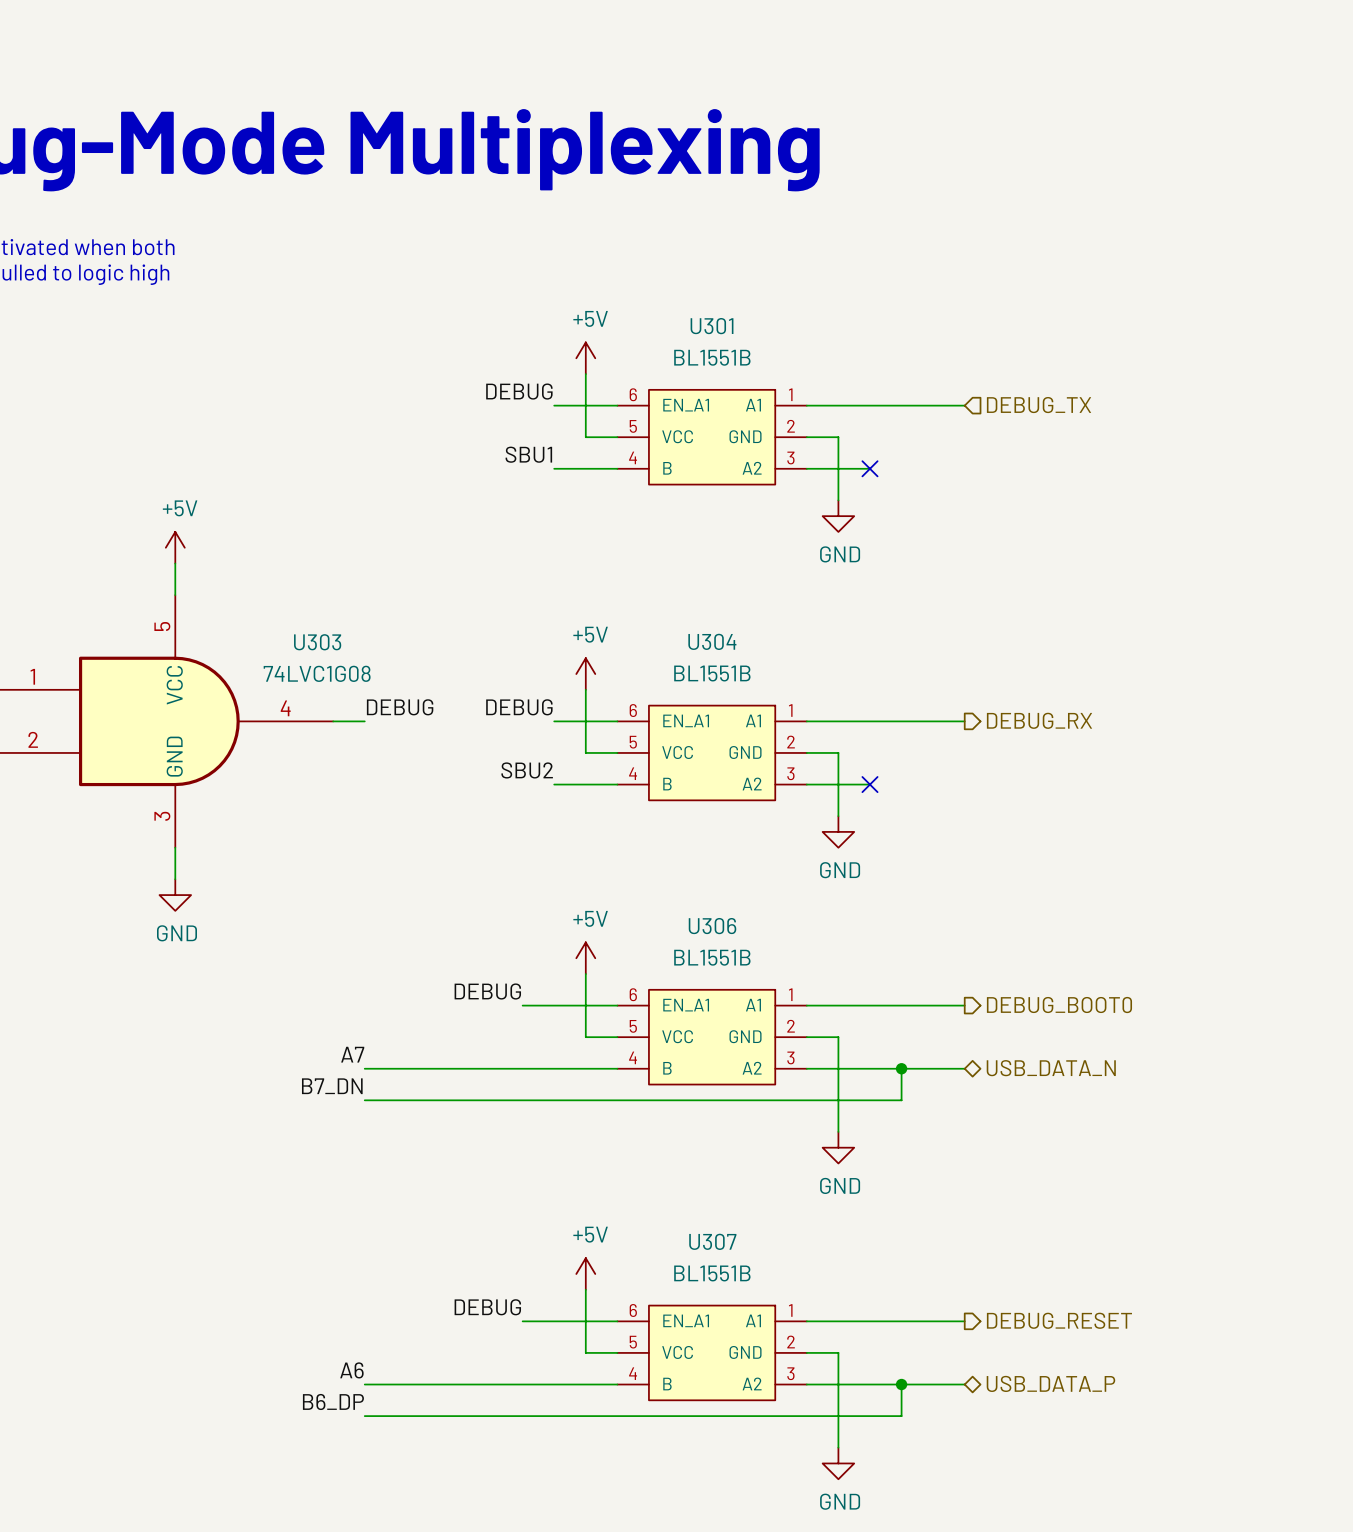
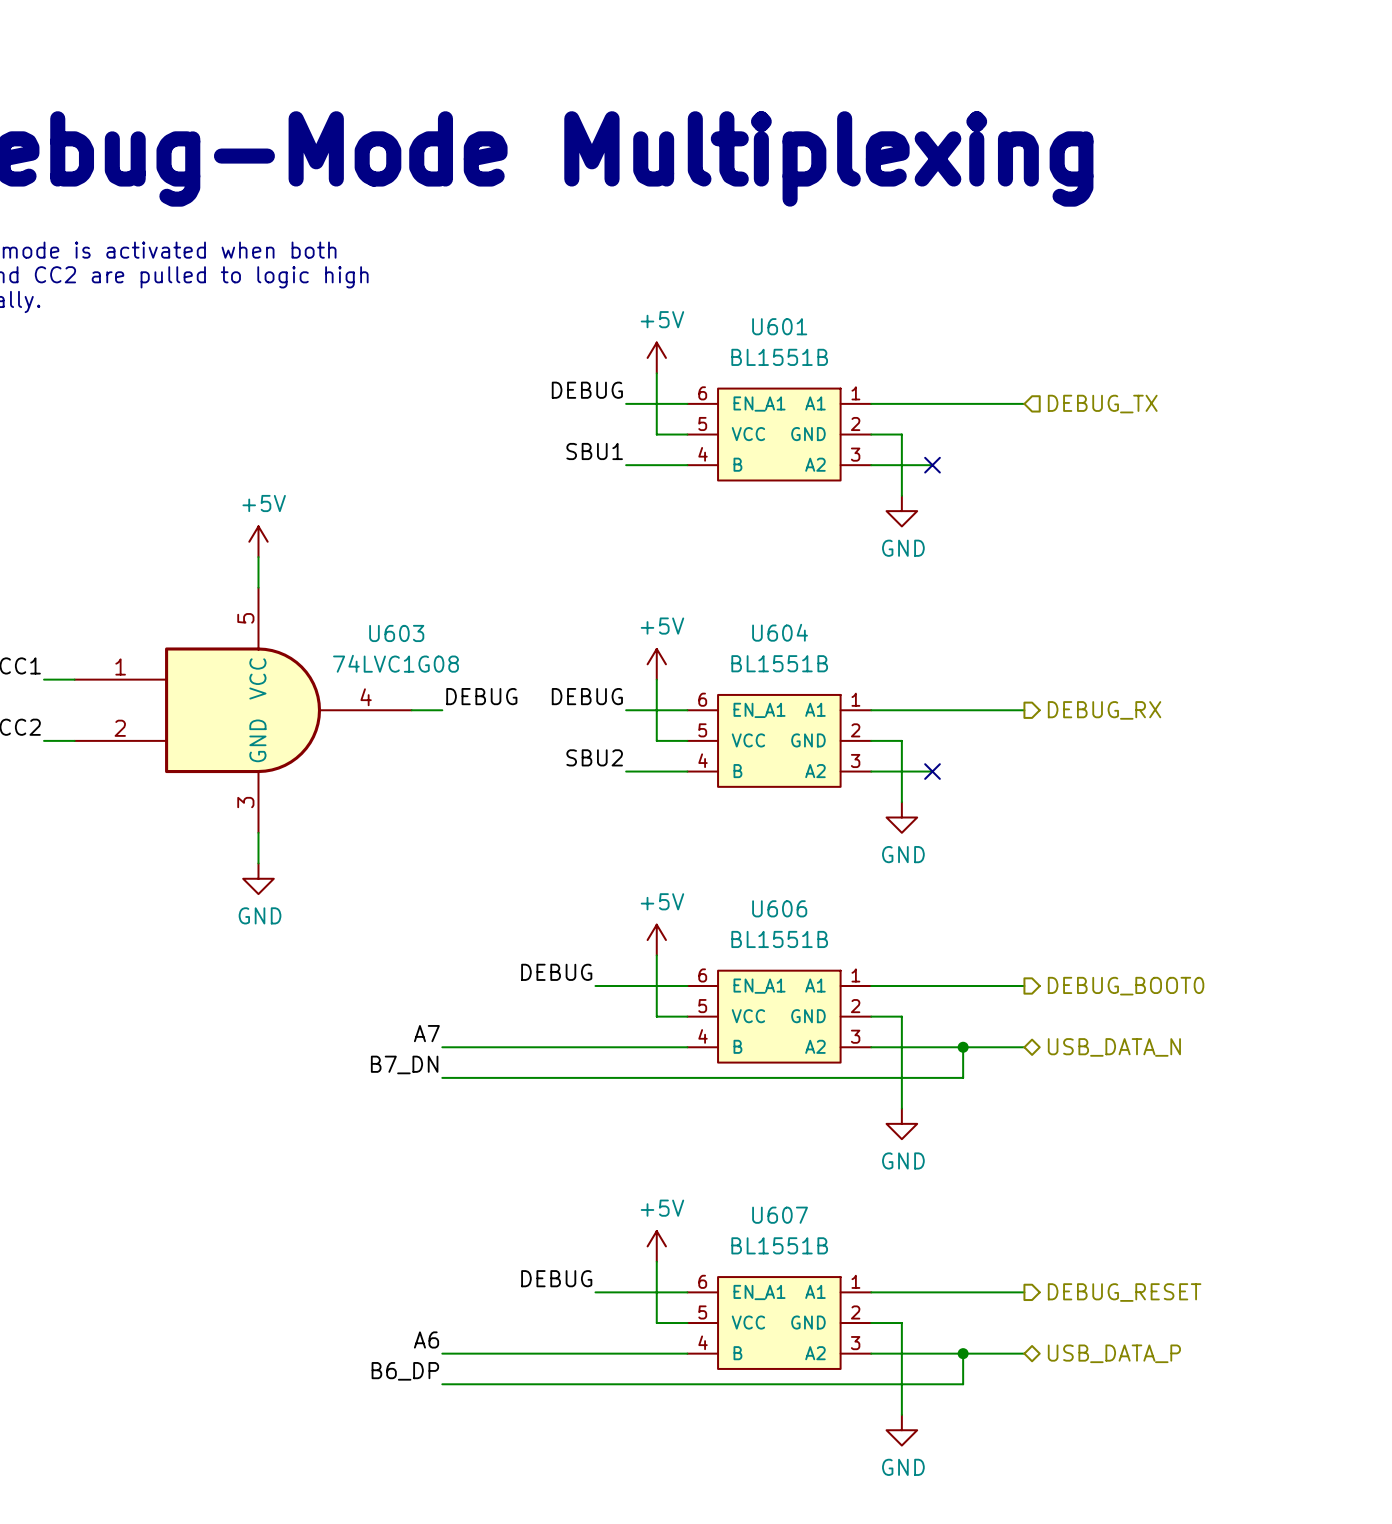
U301 name: U301 (712, 326) -> U601 (779, 326)
U304 name: U304 (712, 641) -> U604 (780, 632)
U303 name: U303 (317, 642) -> U603 (396, 633)
U306 name: U306 (712, 926) -> U606 (779, 908)
U307 name: U307 (712, 1241) -> U607 (780, 1215)

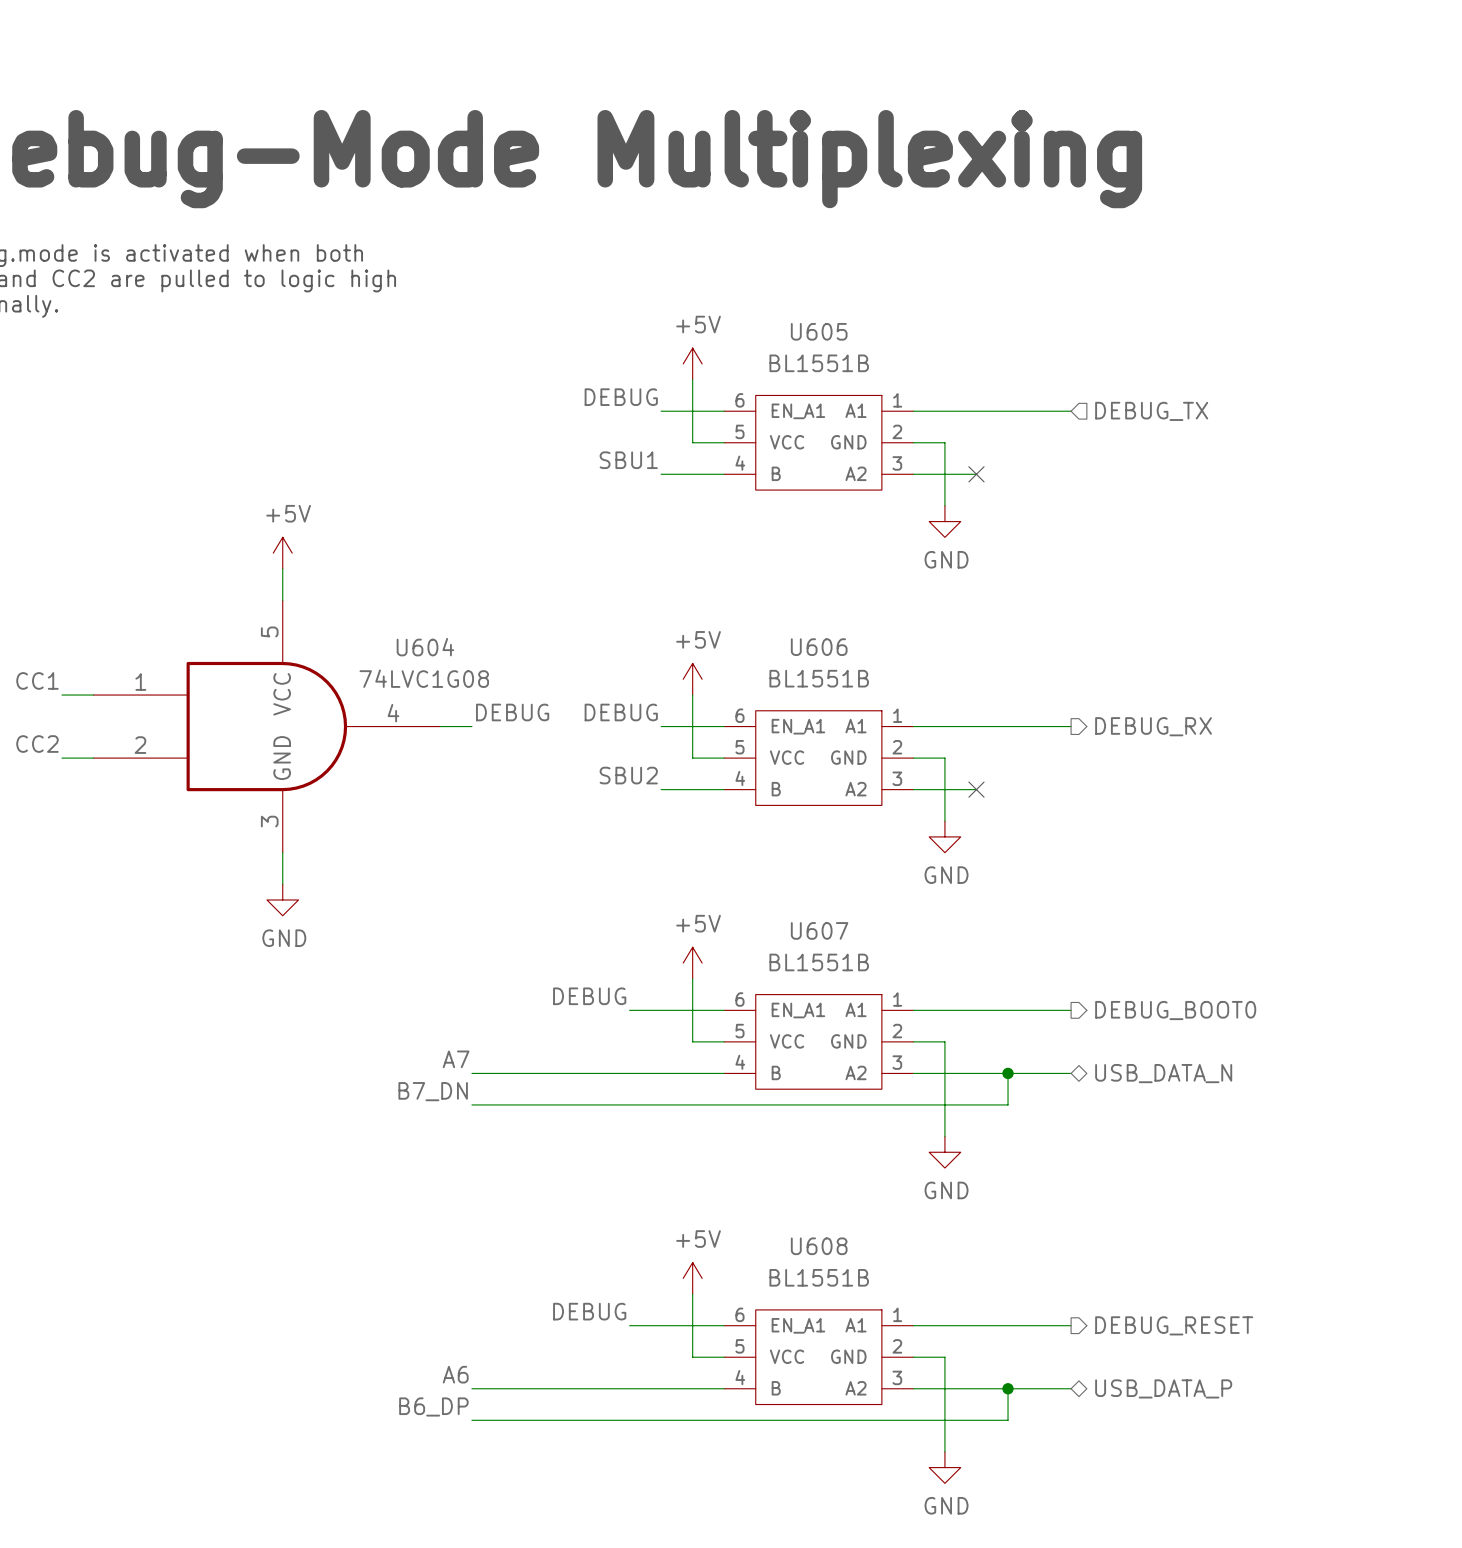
U601 name: U601 (779, 326) -> U605 (819, 331)
U604 name: U604 (780, 632) -> U606 (819, 647)
U603 name: U603 (396, 633) -> U604 (425, 647)
U606 name: U606 (779, 908) -> U607 (819, 930)
U607 name: U607 (780, 1215) -> U608 (819, 1246)

